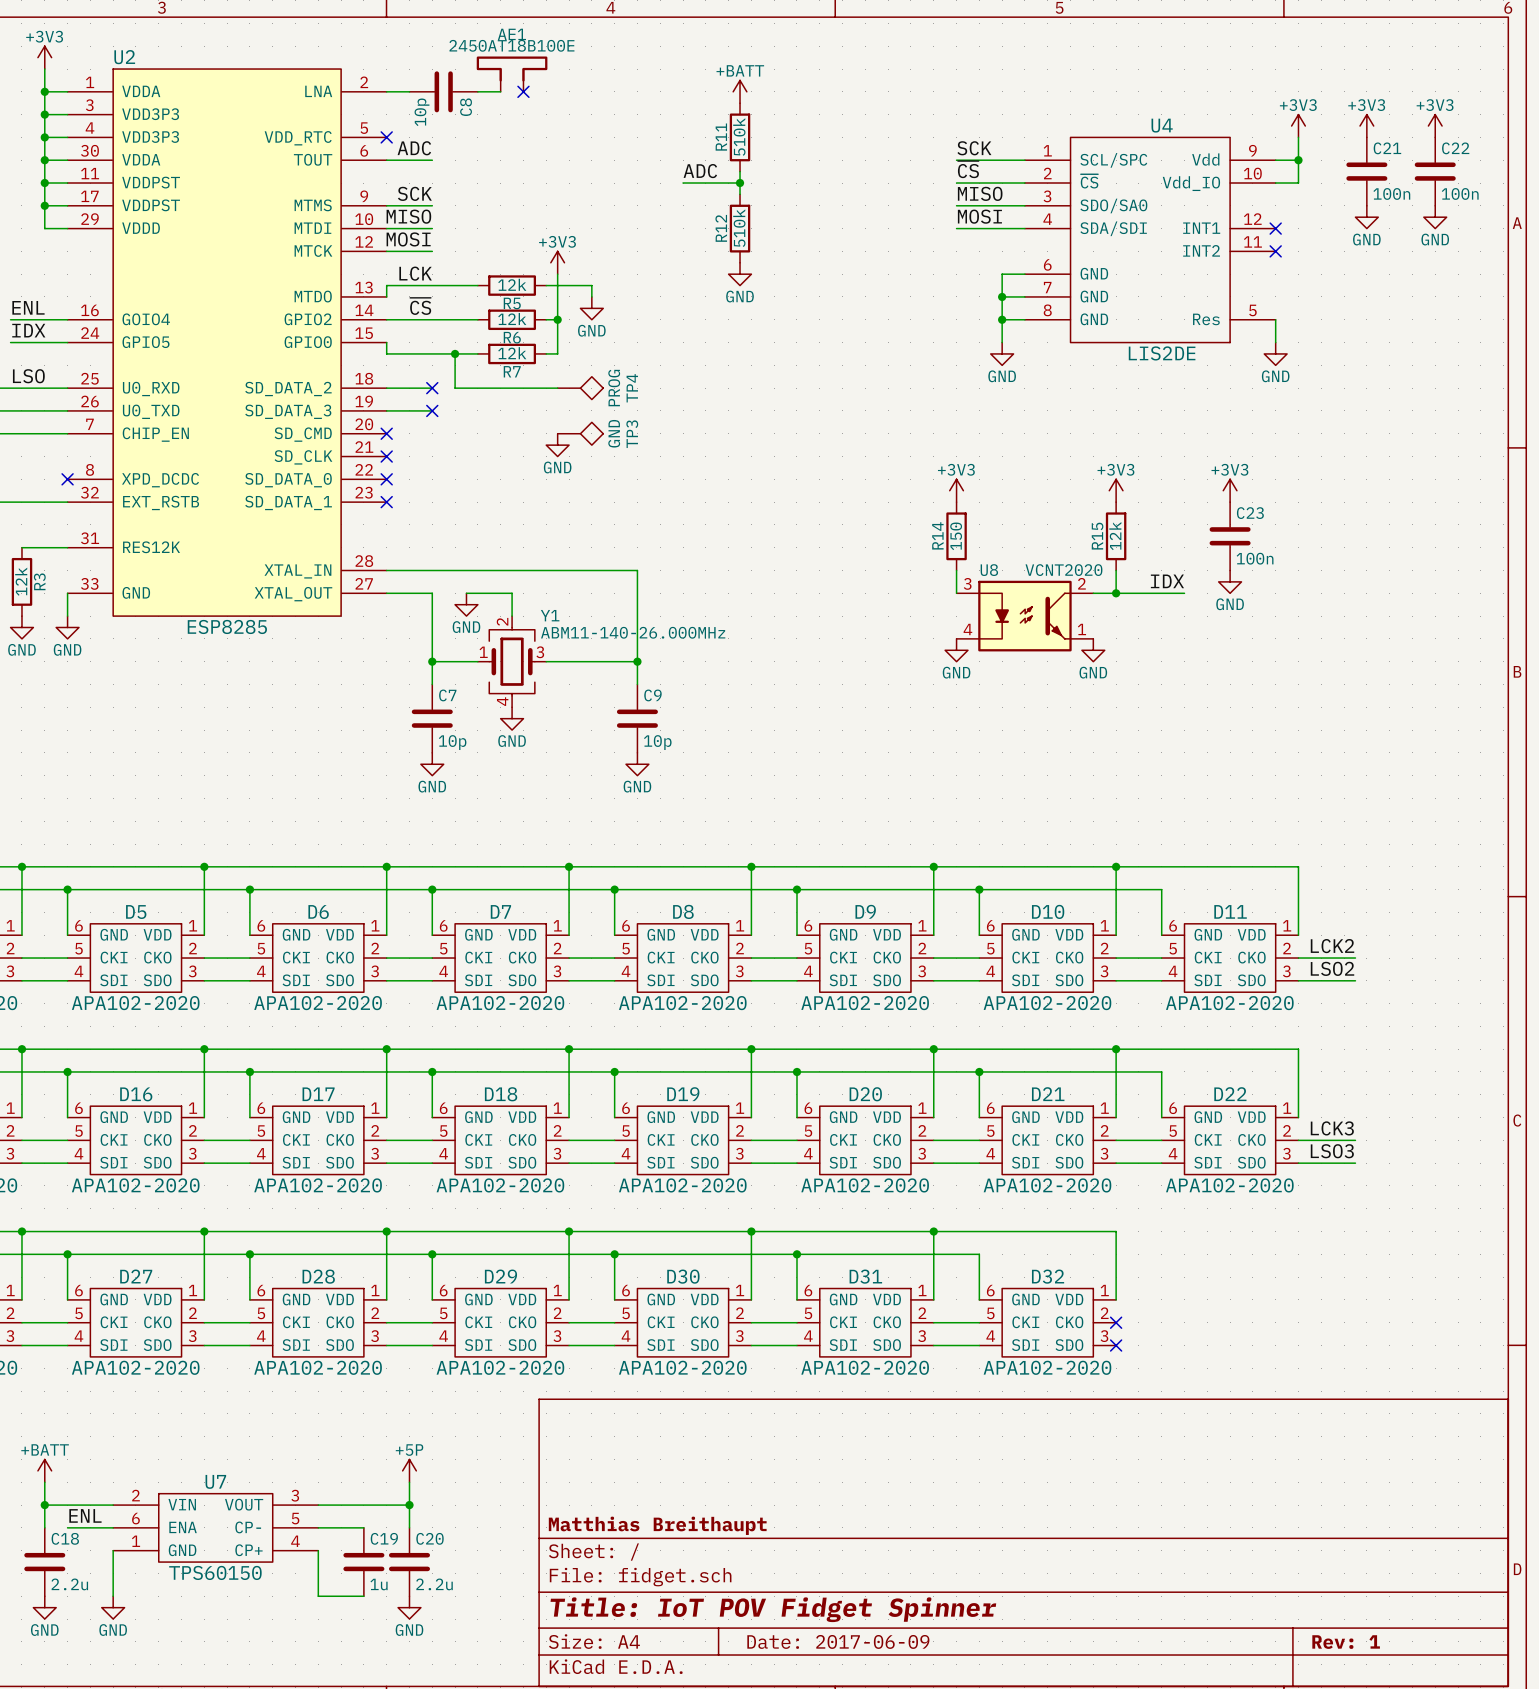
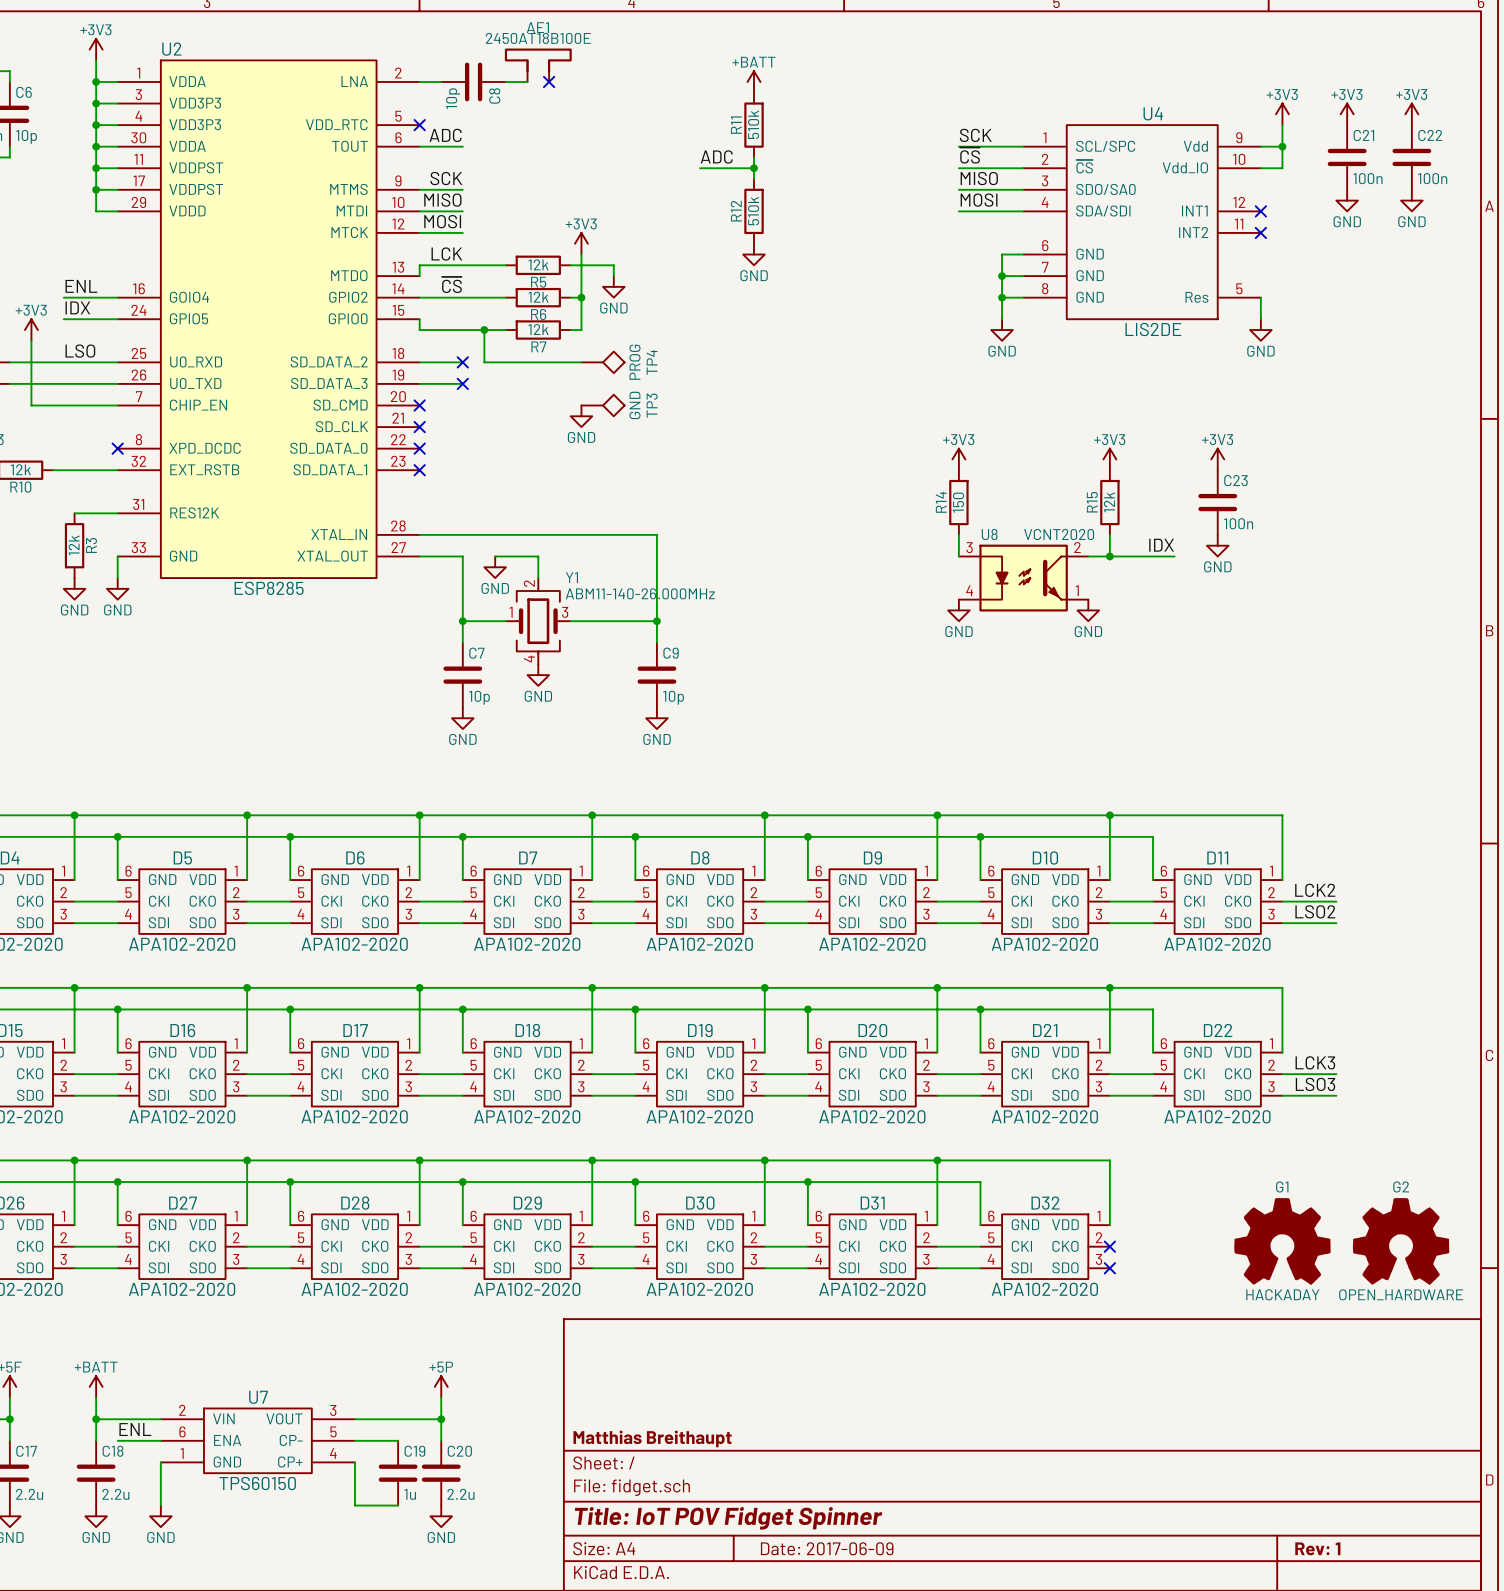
G1: none -> HACKADAY (1282, 1241)
G2: none -> OPEN_HARDWARE (1401, 1241)

